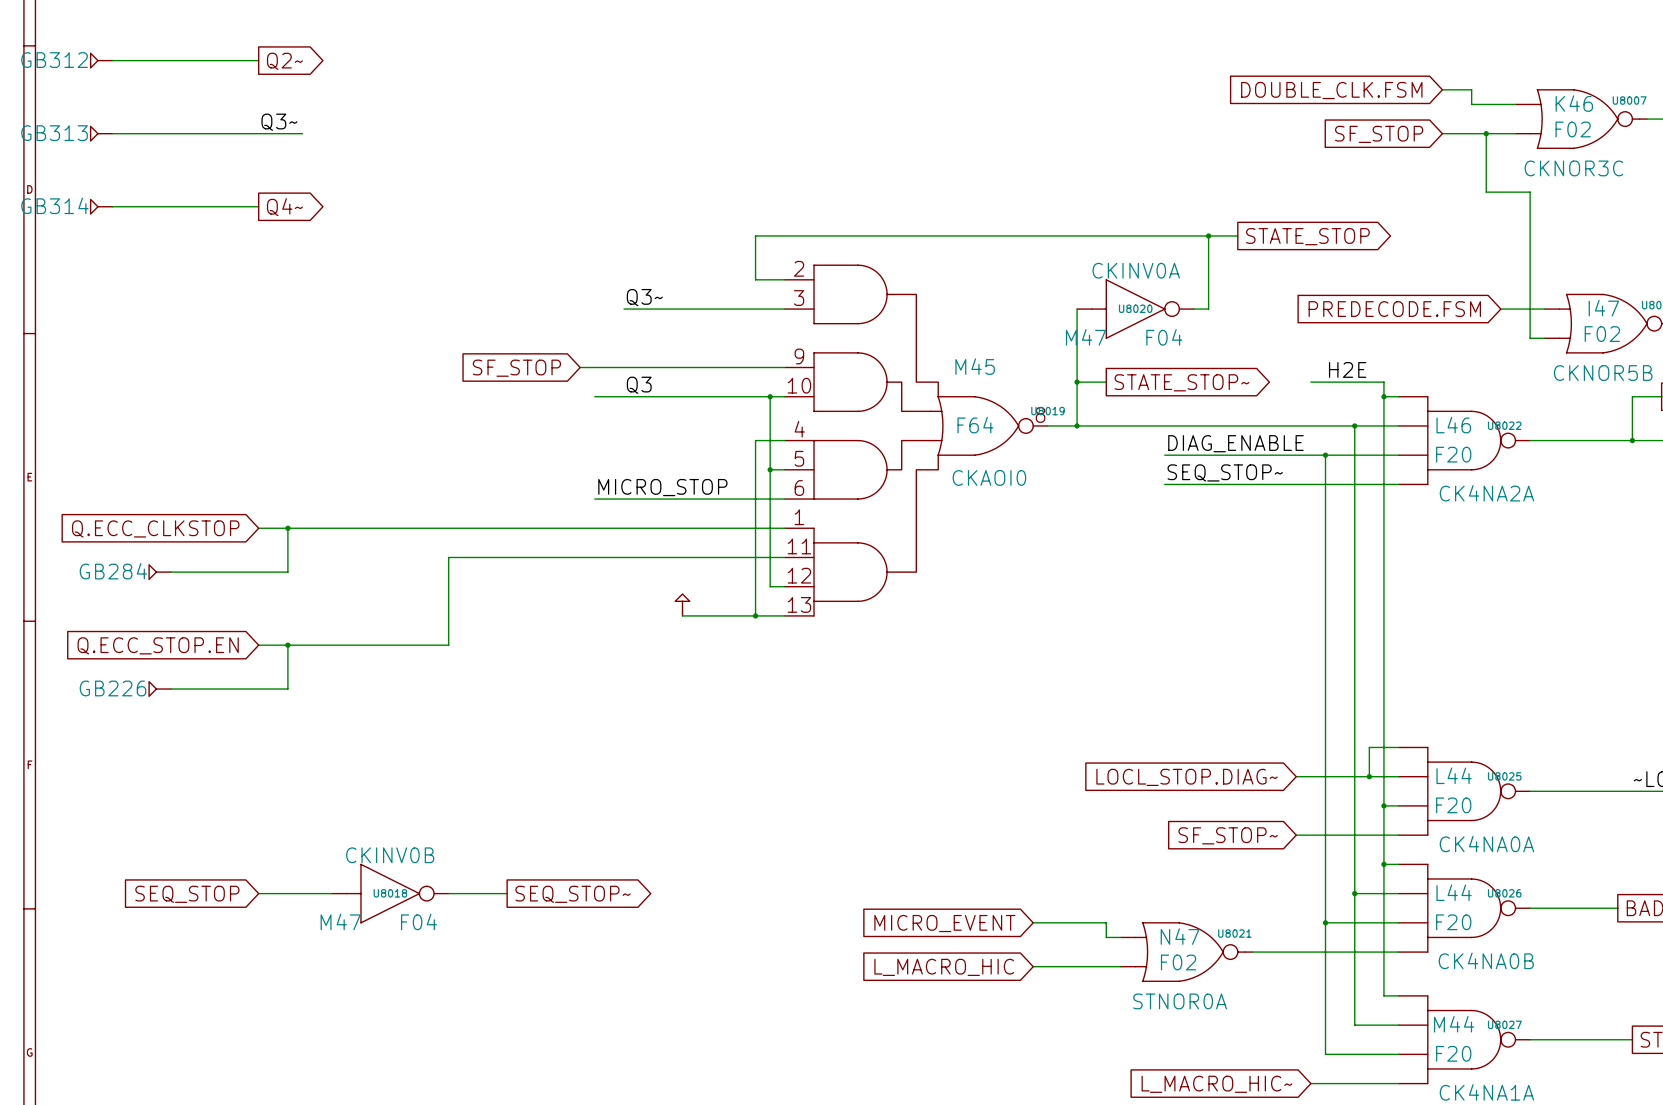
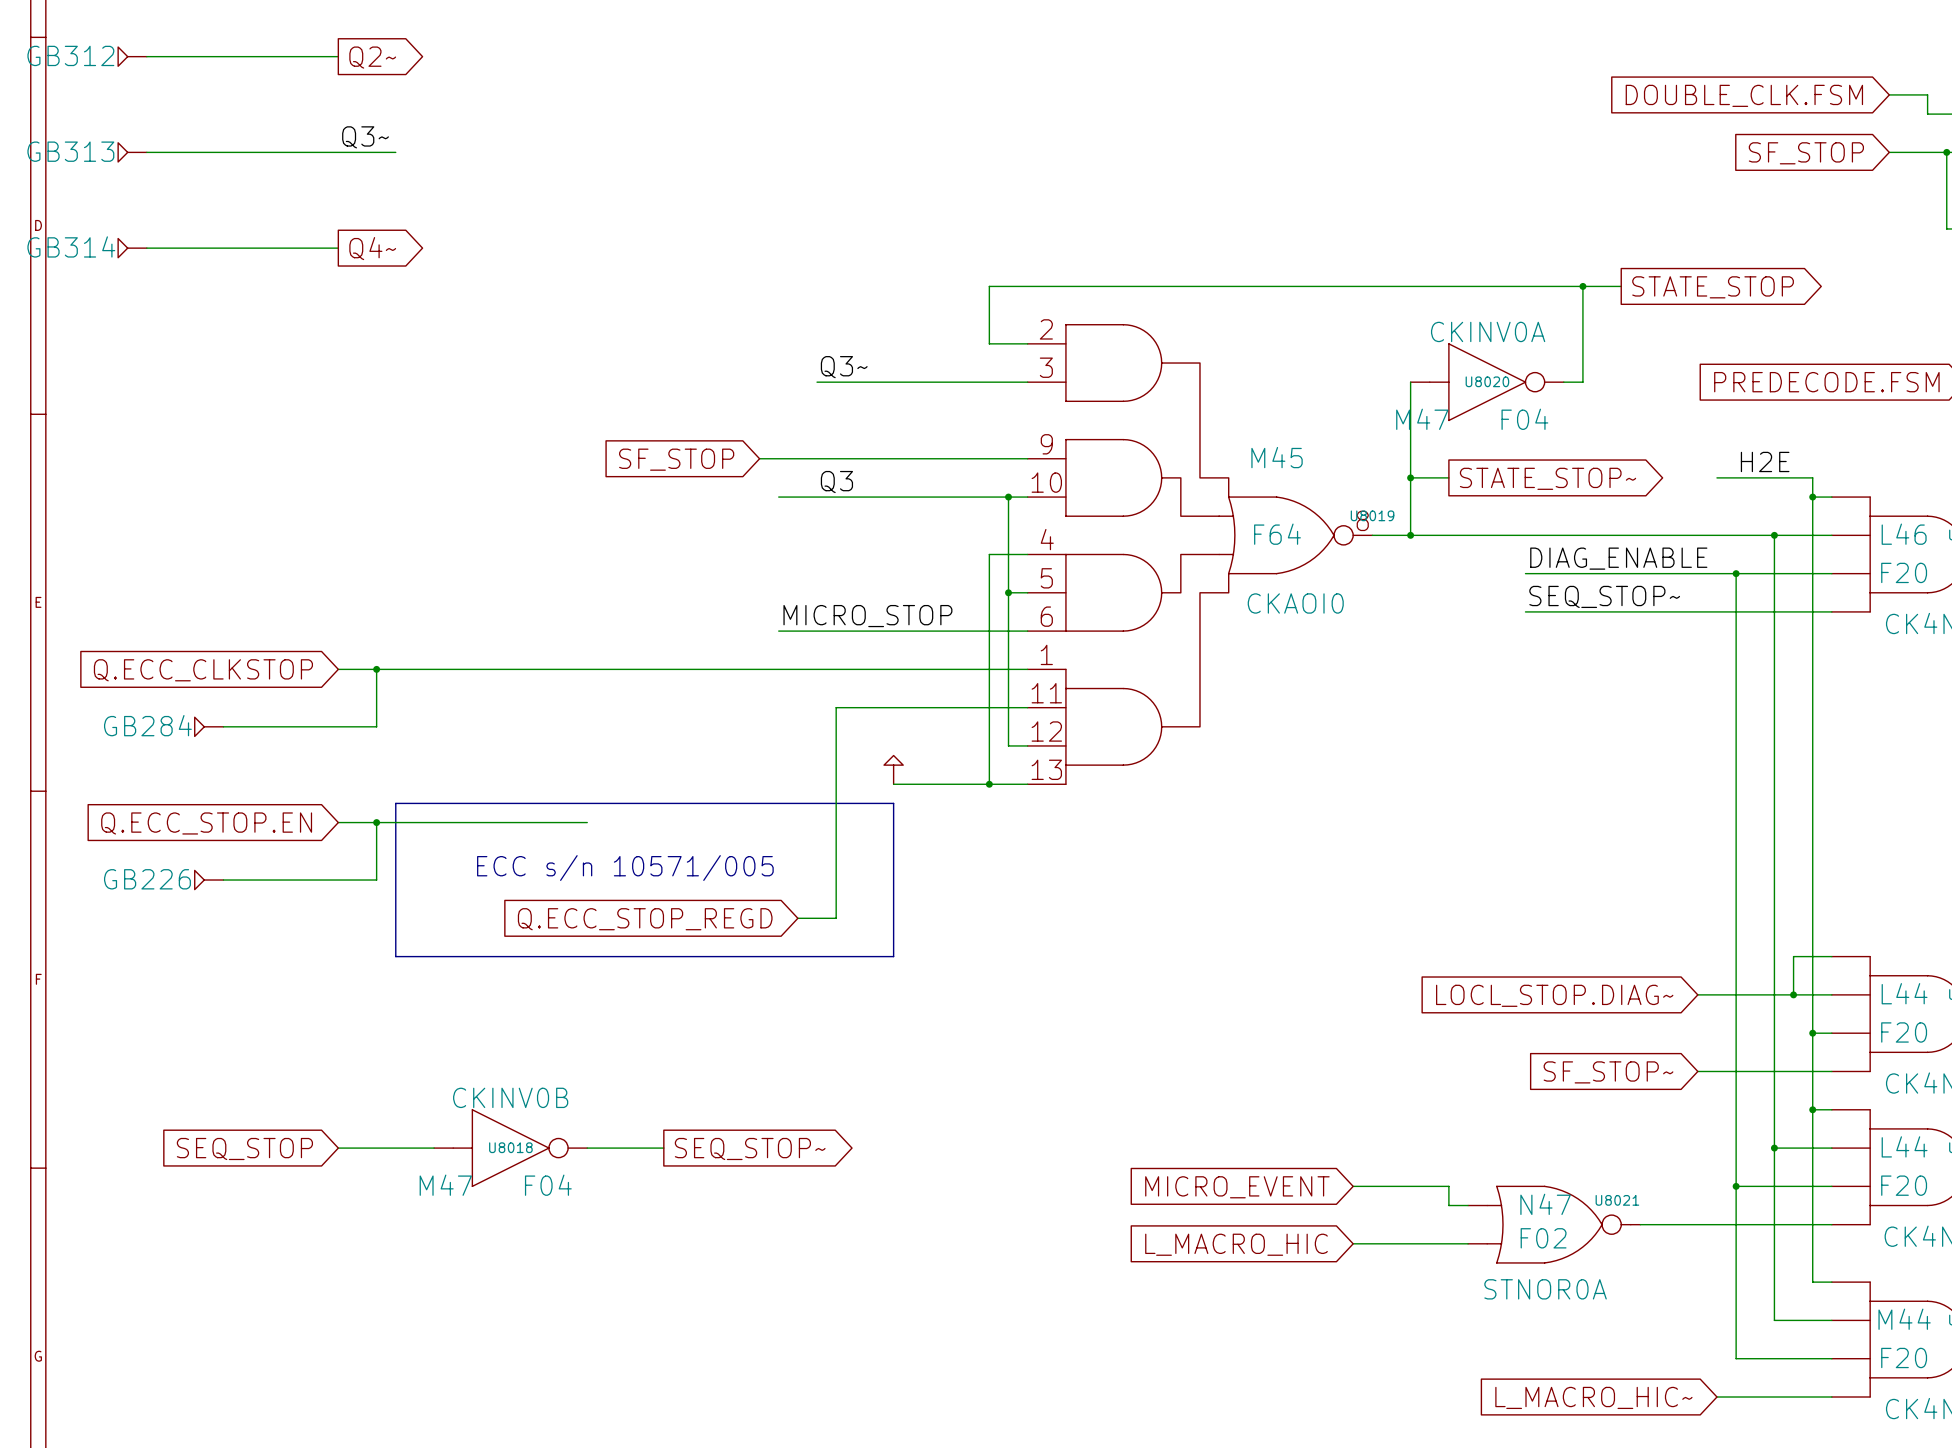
wire: (638, 557) (448, 557) (448, 645) -> (836, 707) (836, 918) (797, 918)
line: none -> (395, 803) (893, 803) (893, 956) (395, 956) (395, 803)
text: none -> ECC s/n 10571/005 (625, 868)
global label: none -> Q.ECC_STOP_REGD (645, 919)

